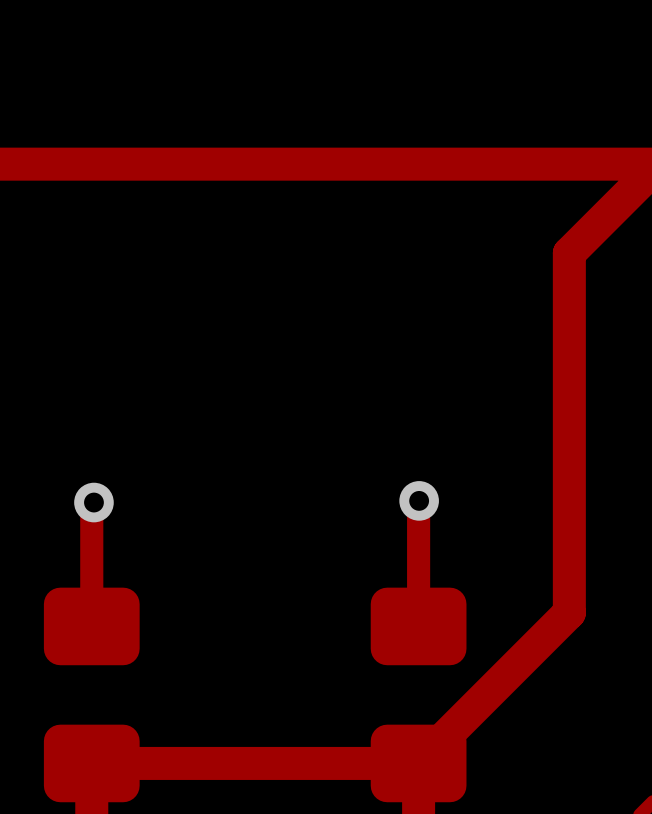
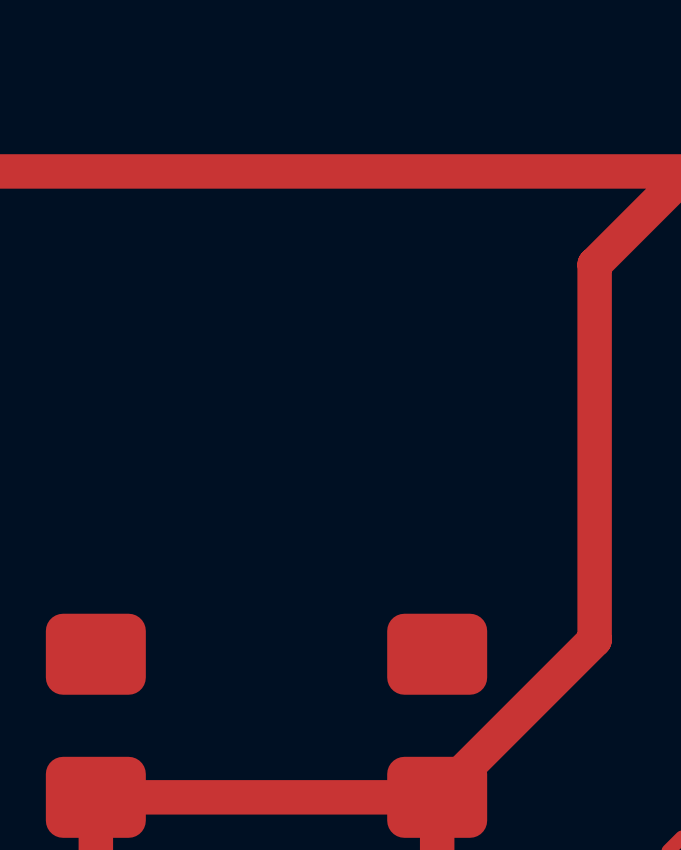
via: (419, 500) -> none
top track: (418, 501) (418, 626) -> none
top track: (93, 502) (91, 504) (91, 626) -> none
via: (93, 502) -> none

